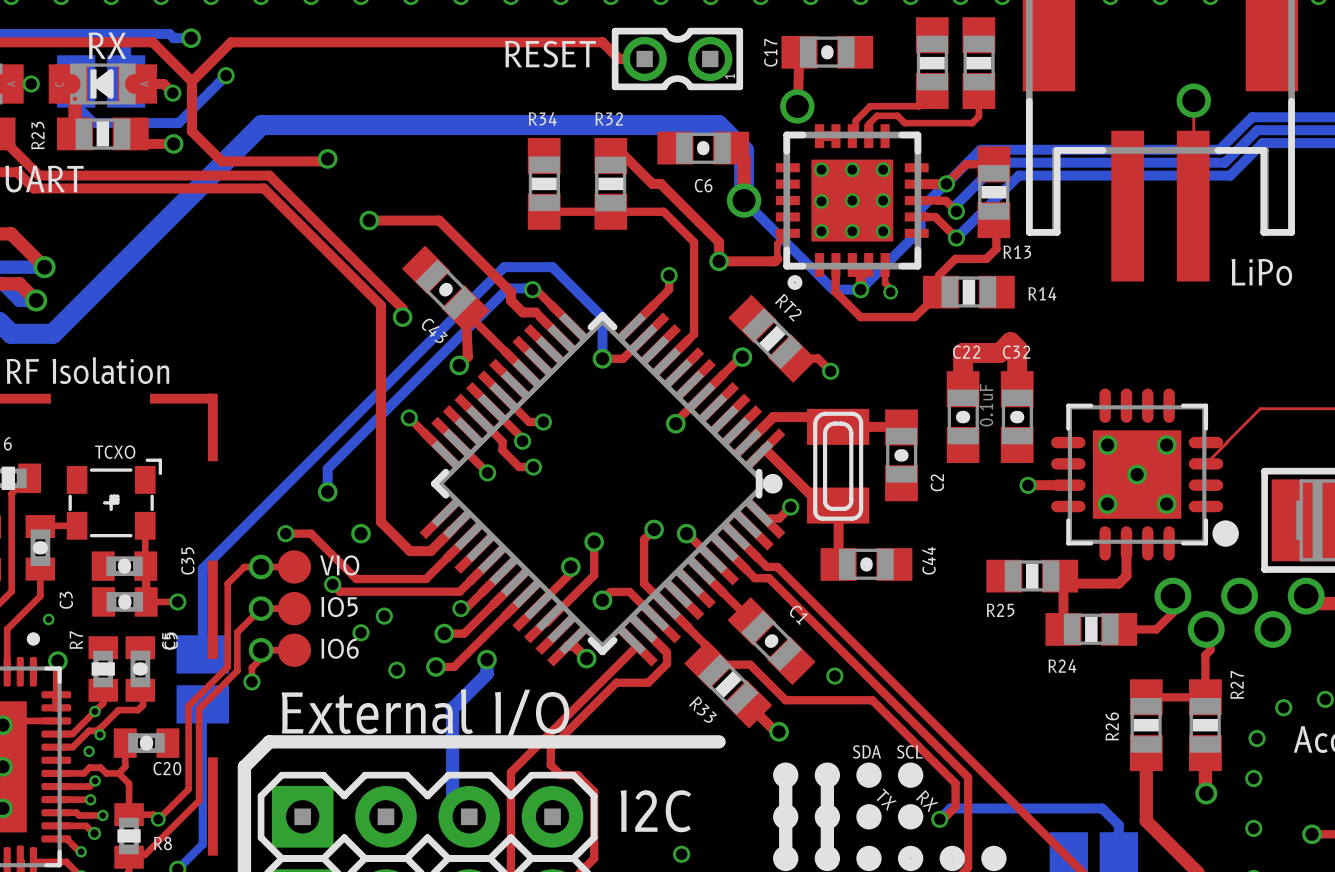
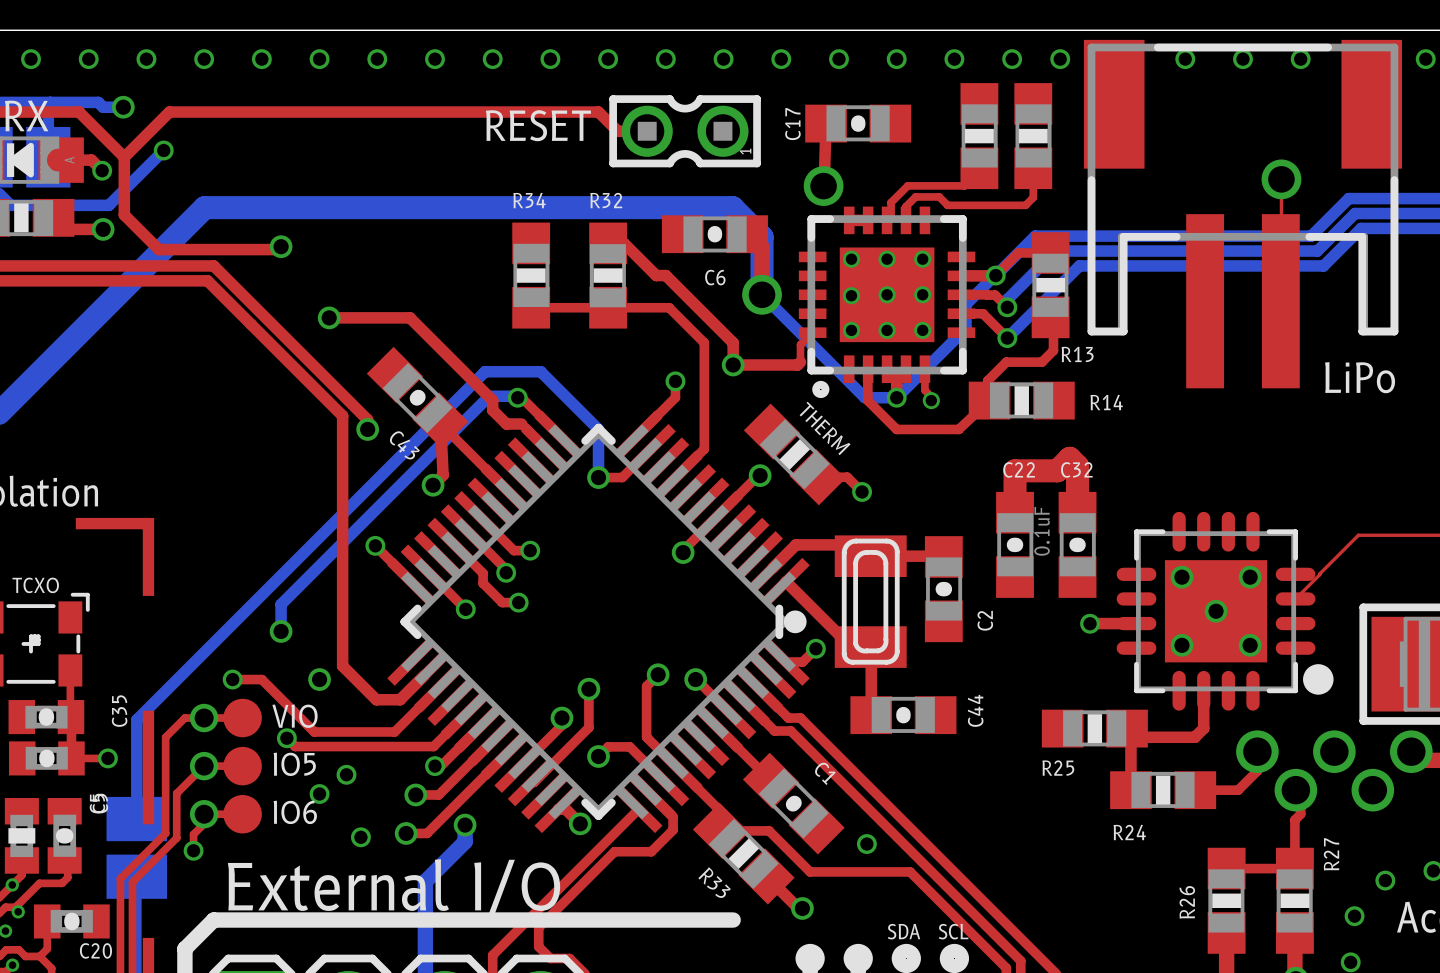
RT2 name: RT2 (788, 307) -> THERM (825, 428)

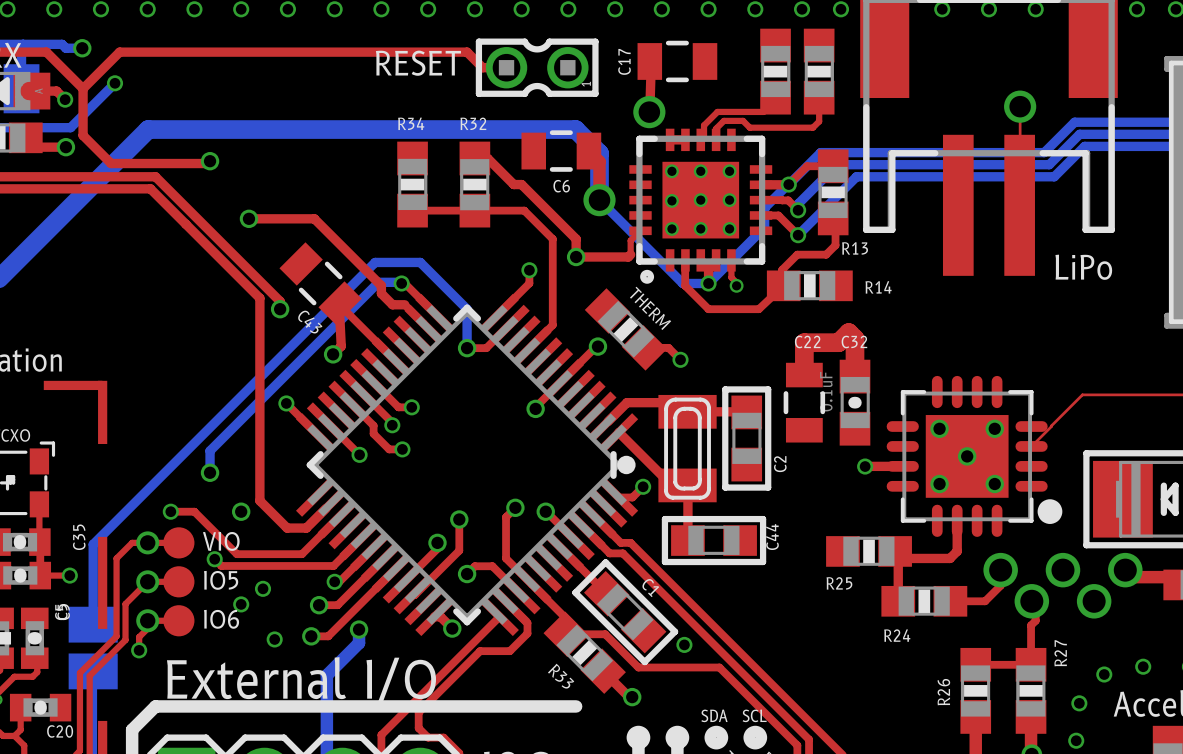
part footprint: [805, 104, 912, 143] -> [637, 40, 718, 83]
part footprint: [661, 215, 768, 254] -> [521, 130, 602, 172]
part footprint: [366, 346, 469, 449] -> [279, 242, 362, 325]
part footprint: [996, 491, 1034, 598] -> [783, 362, 826, 443]
part footprint: [924, 536, 963, 643] -> [722, 386, 772, 491]
part footprint: [850, 696, 957, 735] -> [661, 515, 767, 566]
part footprint: [742, 752, 845, 855] -> [572, 559, 679, 666]

